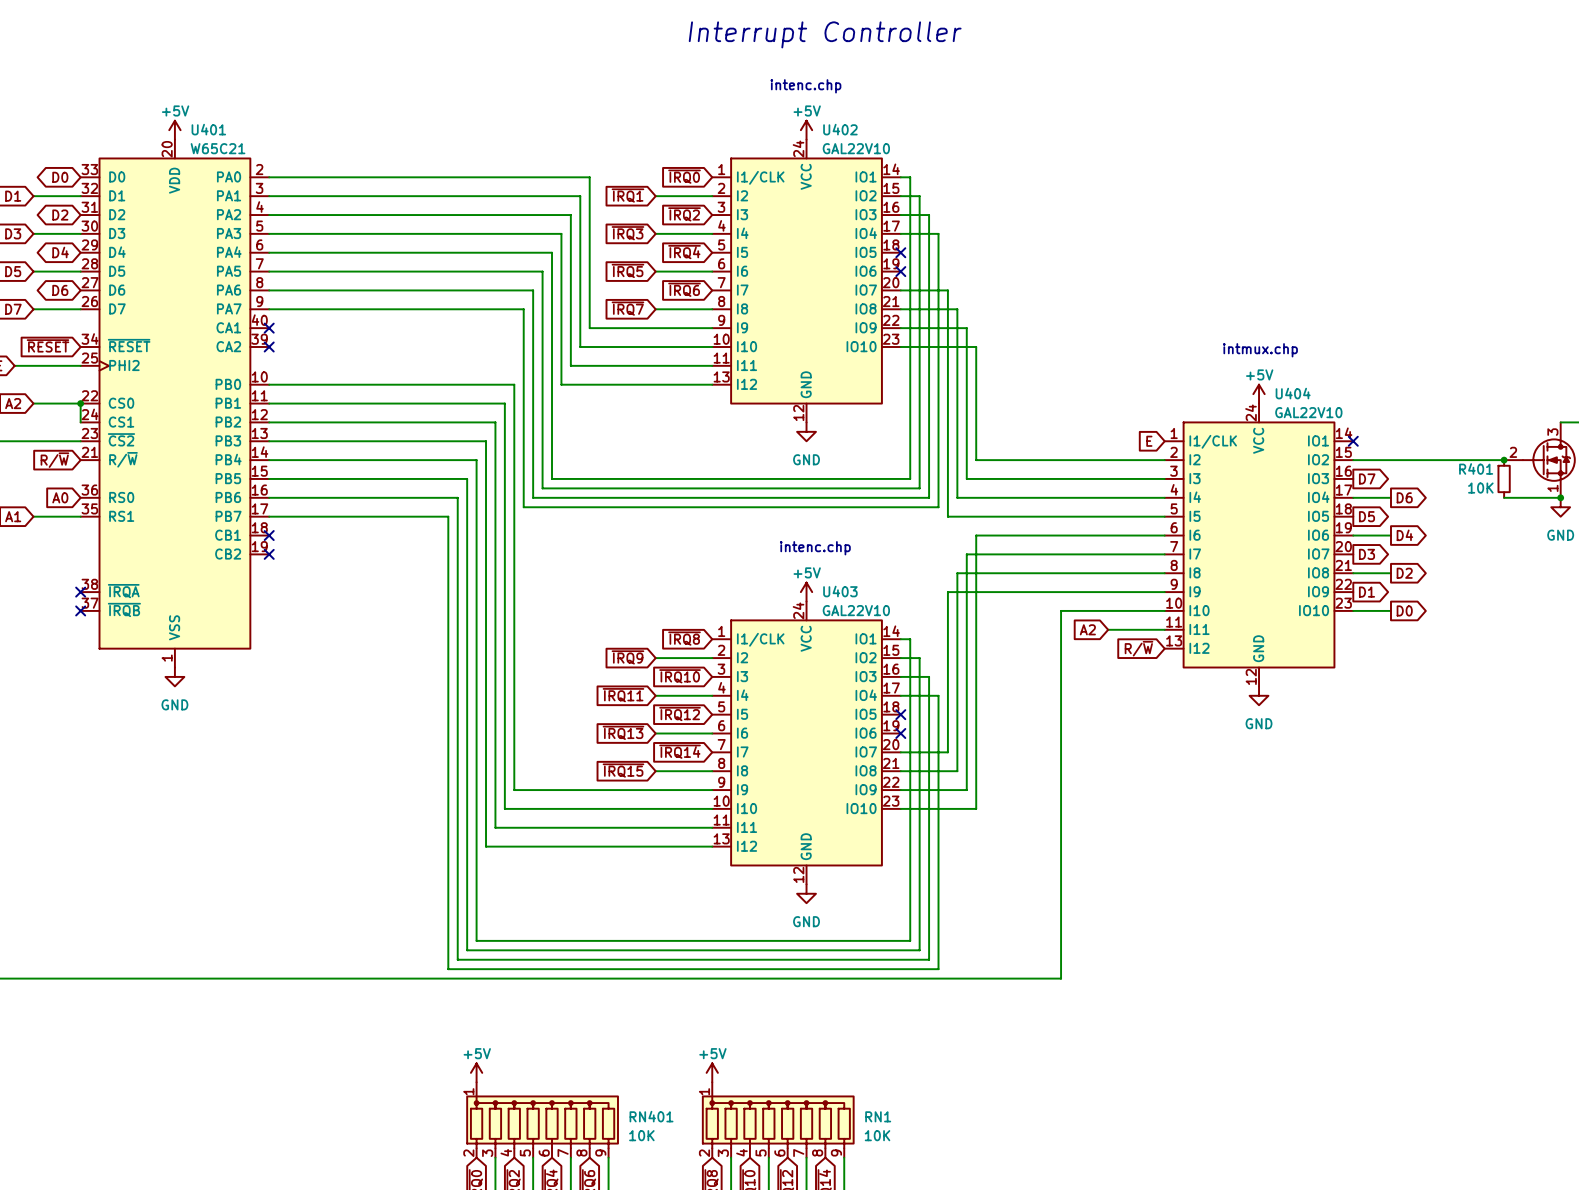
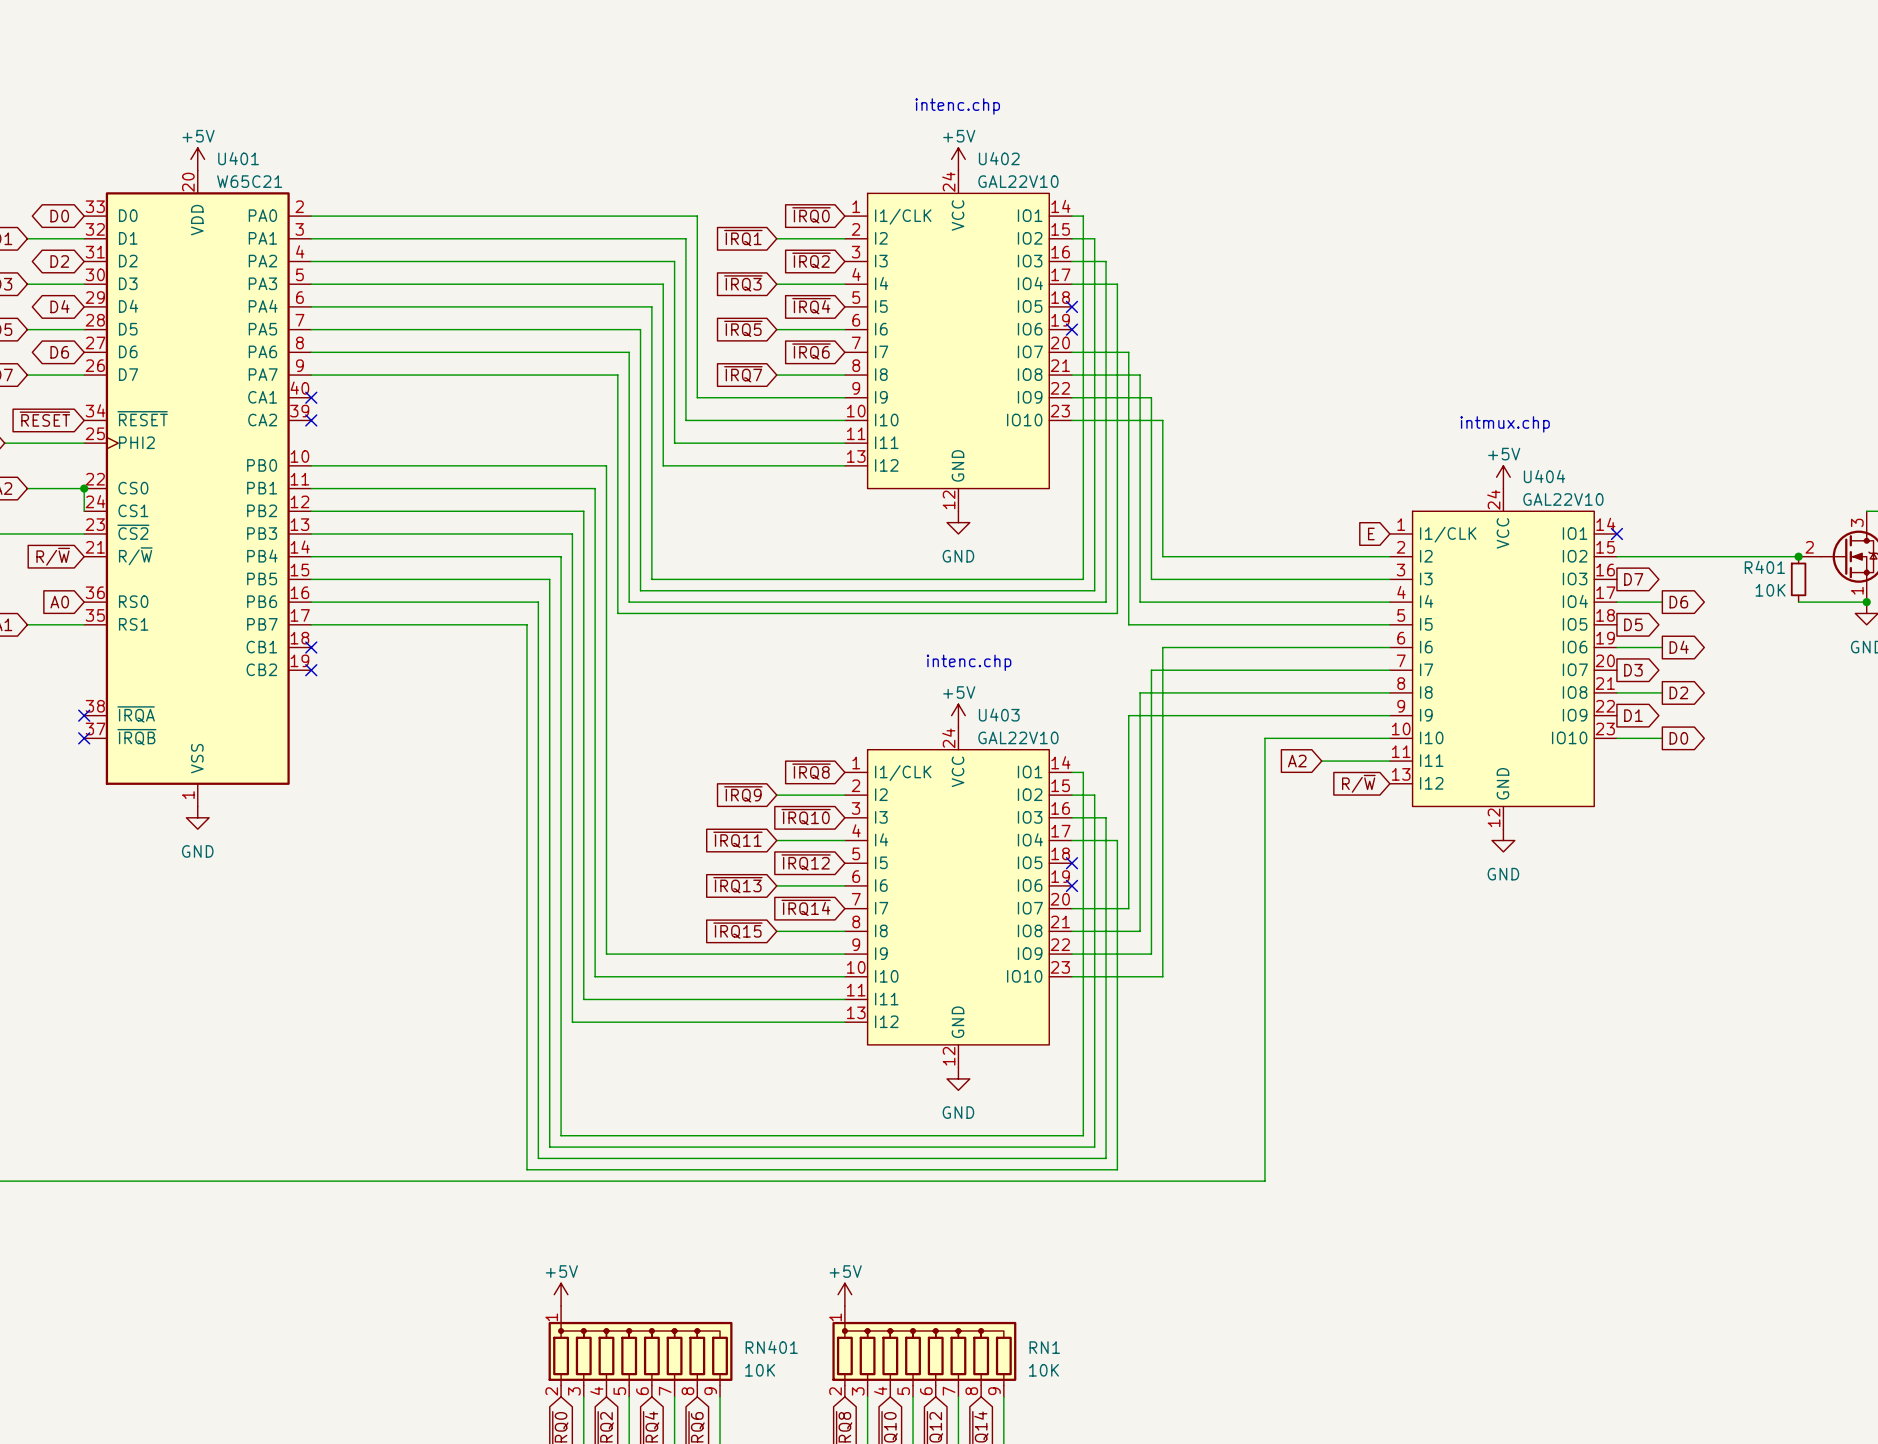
text: Interrupt Controller (825, 34) -> none

